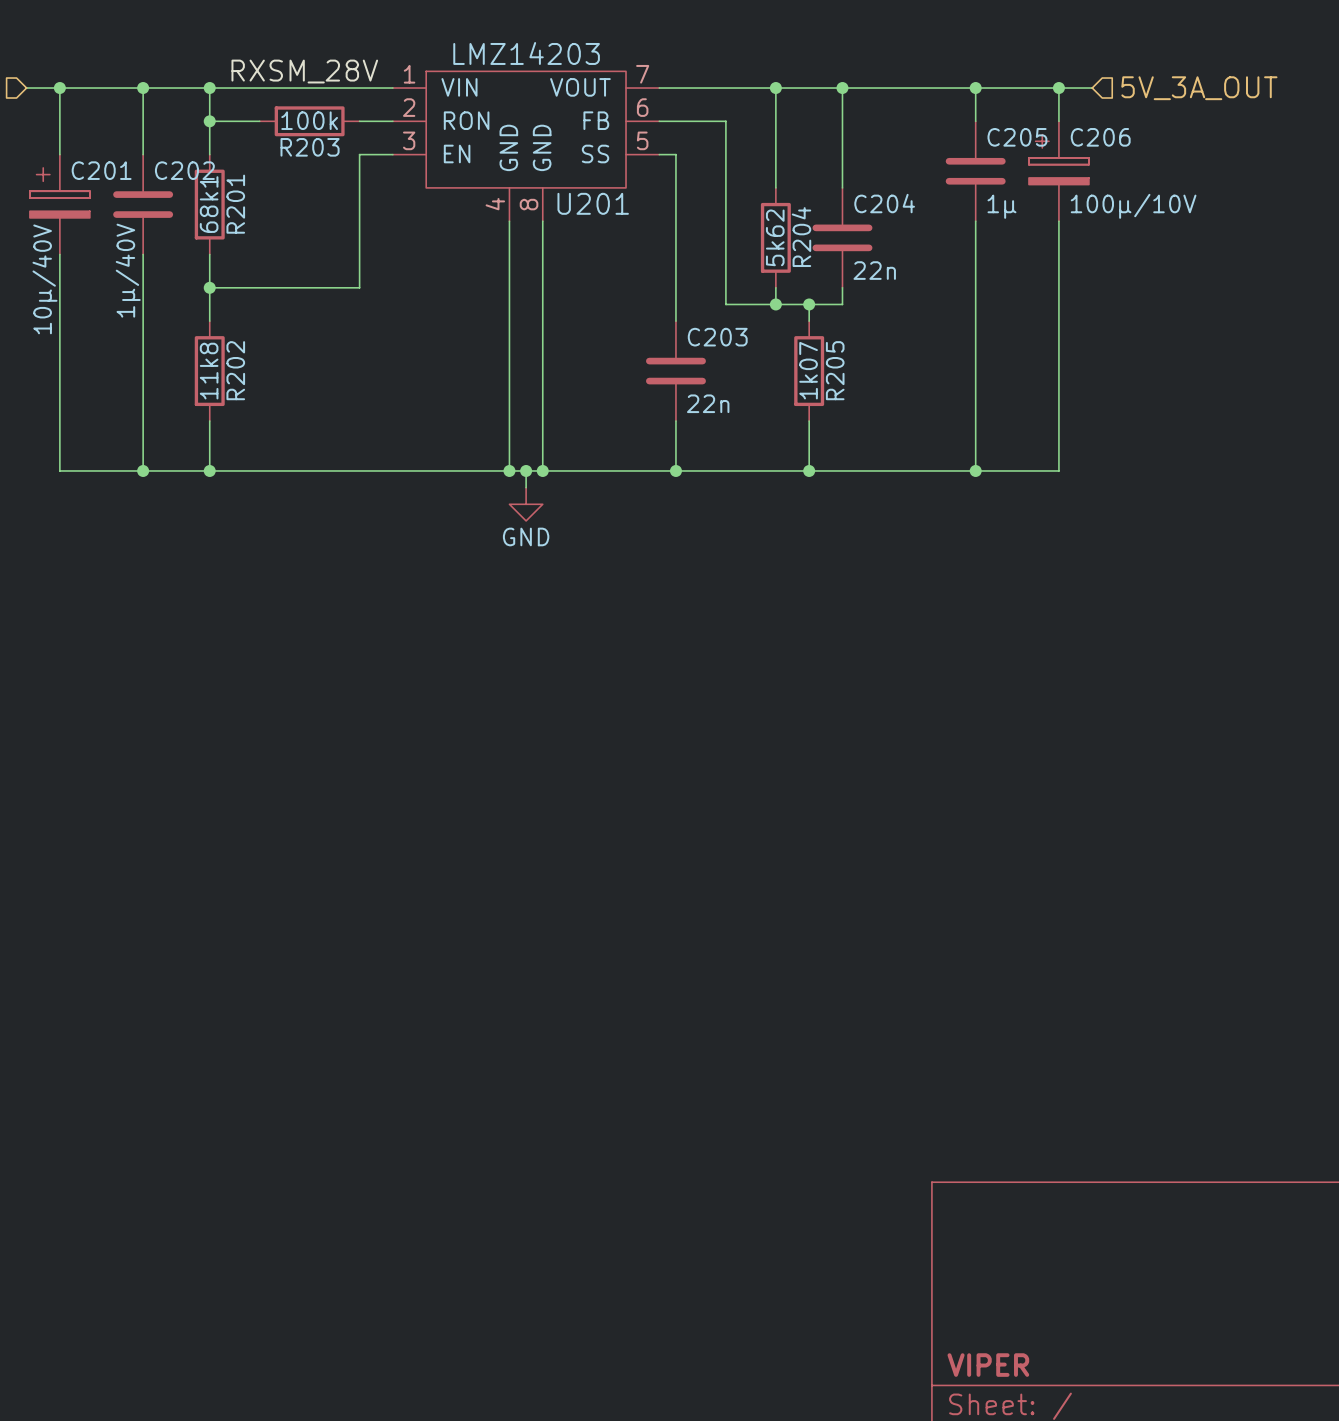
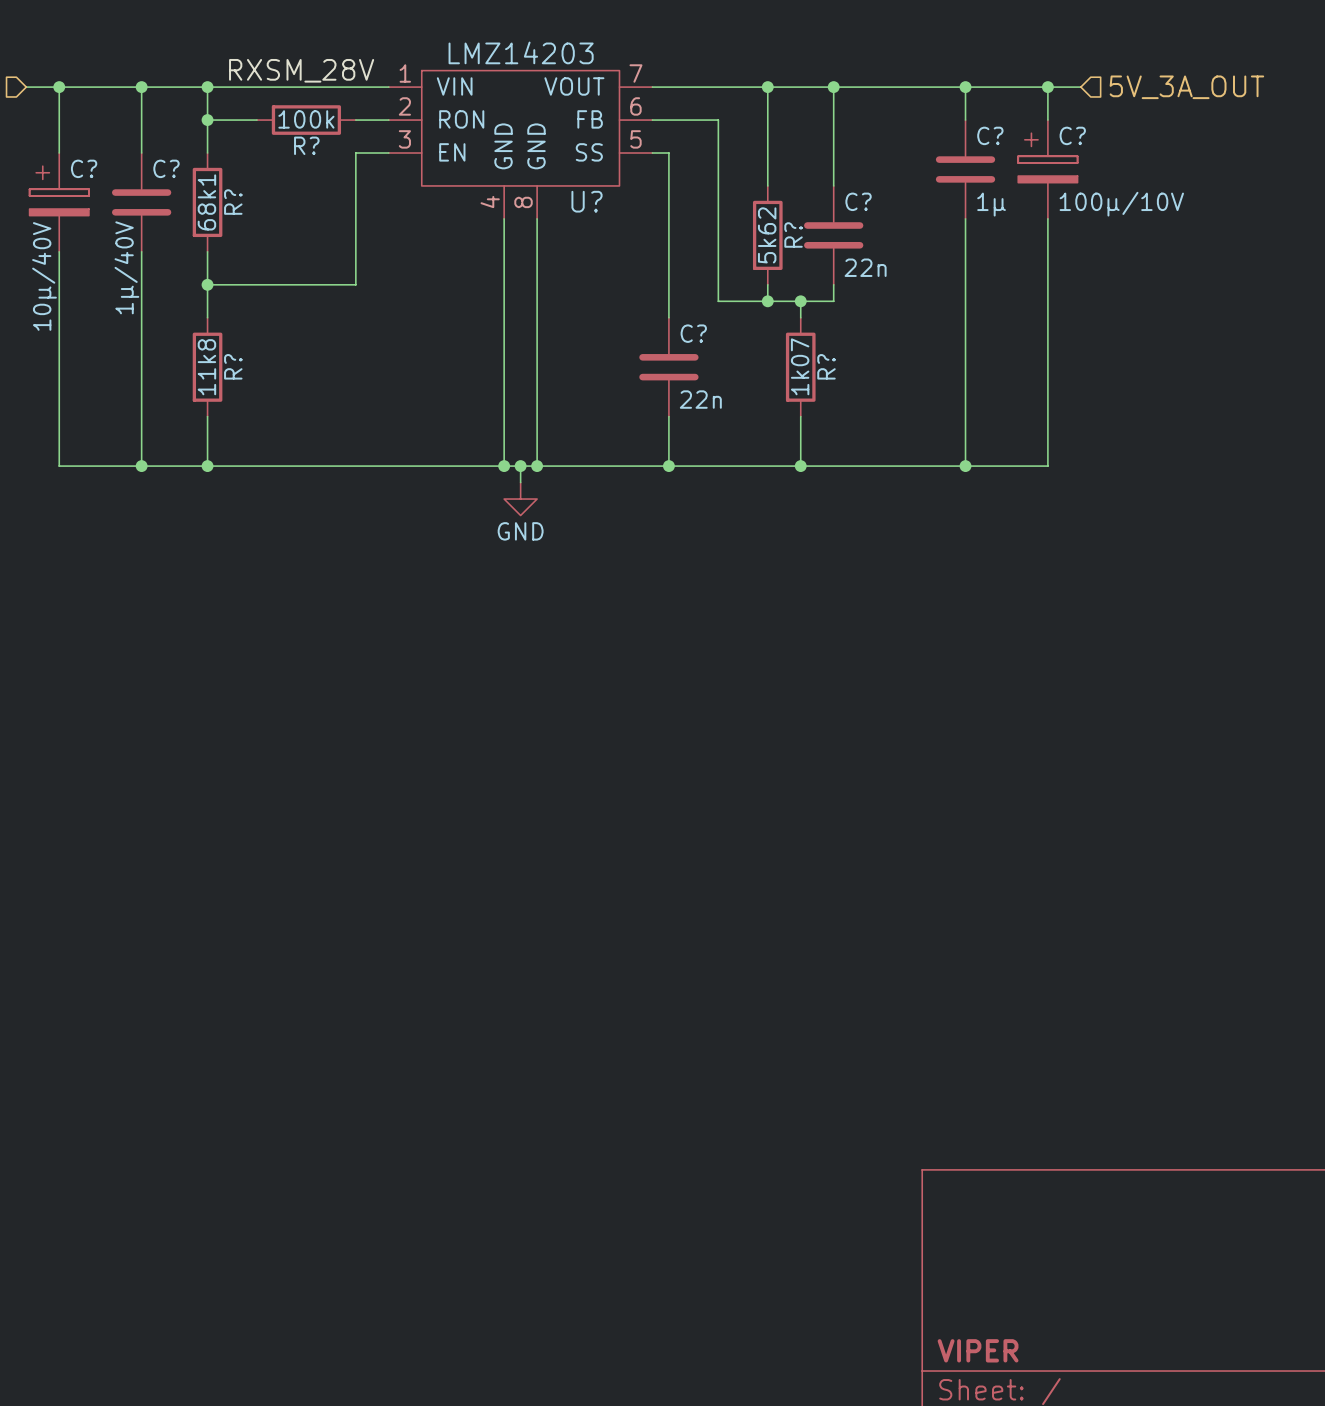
C205 name: C205 (1017, 137) -> C? (990, 135)
C206 name: C206 (1100, 137) -> C? (1072, 135)
R203 name: R203 (310, 147) -> R? (306, 145)
C201 name: C201 (101, 170) -> C? (84, 168)
C202 name: C202 (184, 170) -> C? (166, 168)
U201 name: U201 (593, 203) -> U? (587, 201)
C204 name: C204 (884, 203) -> C? (858, 201)
R201 name: R201 (235, 204) -> R? (233, 202)
R204 name: R204 (801, 237) -> R? (793, 235)
C203 name: C203 (717, 337) -> C? (693, 333)
R202 name: R202 (235, 370) -> R? (233, 366)
R205 name: R205 (835, 370) -> R? (826, 366)

